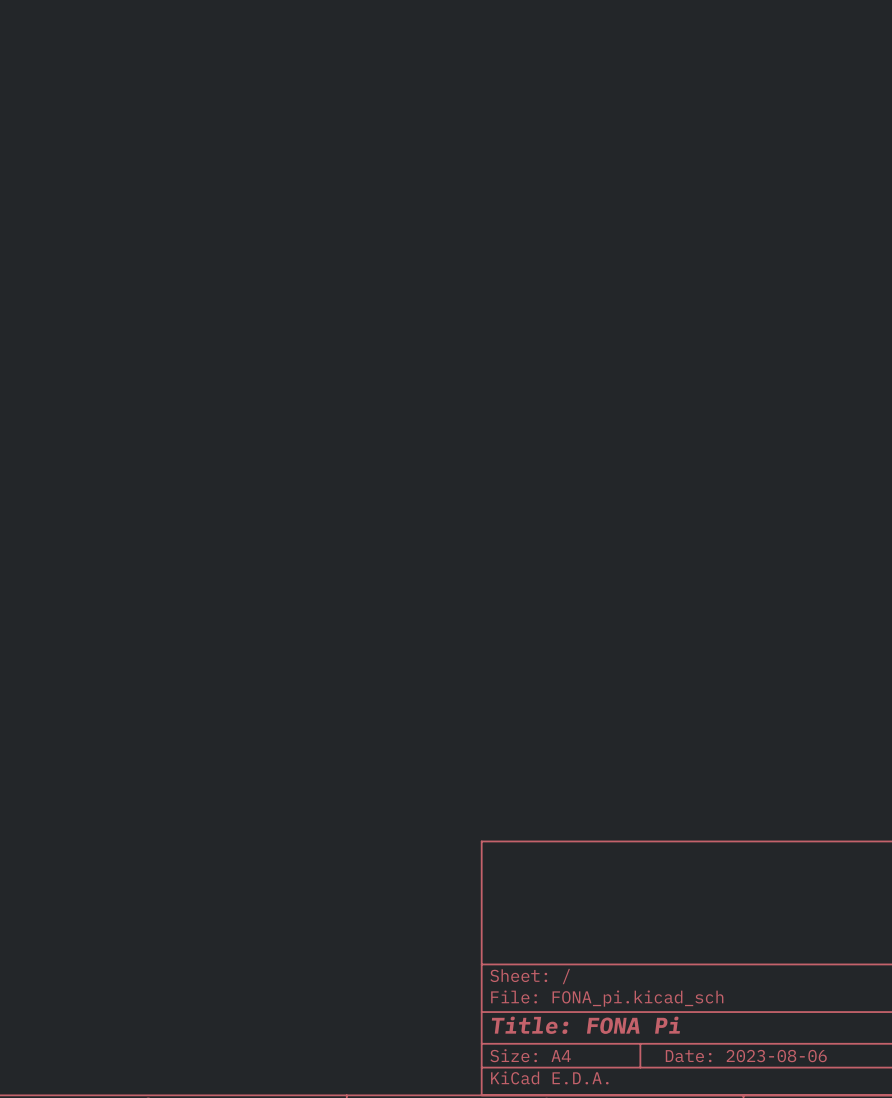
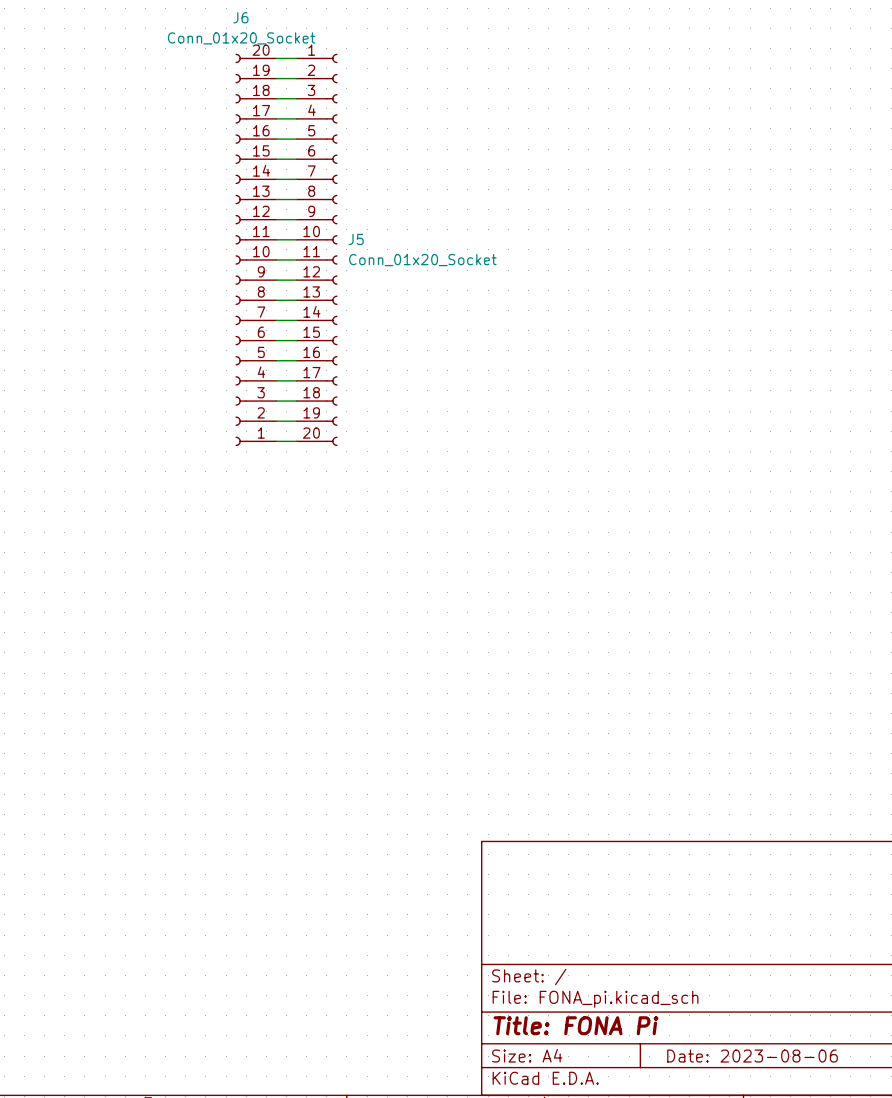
wire: none -> (276, 58) (296, 58)
wire: none -> (276, 78) (296, 78)
wire: none -> (276, 98) (296, 98)
wire: none -> (276, 118) (296, 118)
wire: none -> (276, 139) (296, 139)
wire: none -> (276, 159) (296, 159)
wire: none -> (276, 179) (296, 179)
wire: none -> (276, 199) (296, 199)
wire: none -> (276, 219) (296, 219)
wire: none -> (276, 239) (296, 239)
J6: none -> Conn_01x20_Socket (255, 249)
J5: none -> Conn_01x20_Socket (317, 249)
wire: none -> (276, 259) (296, 259)
wire: none -> (276, 280) (296, 280)
wire: none -> (276, 300) (296, 300)
wire: none -> (276, 320) (296, 320)
wire: none -> (276, 340) (296, 340)
wire: none -> (276, 360) (296, 360)
wire: none -> (276, 380) (296, 380)
wire: none -> (276, 401) (296, 401)
wire: none -> (276, 421) (296, 421)
wire: none -> (276, 441) (296, 441)

